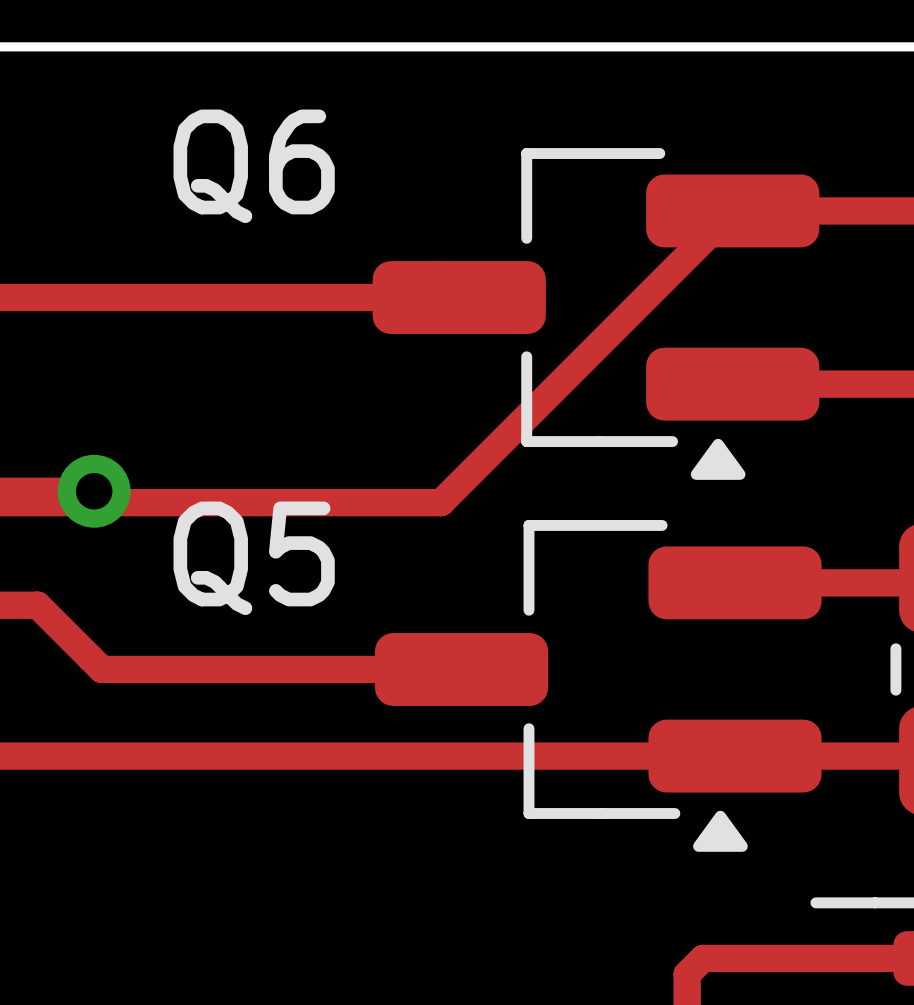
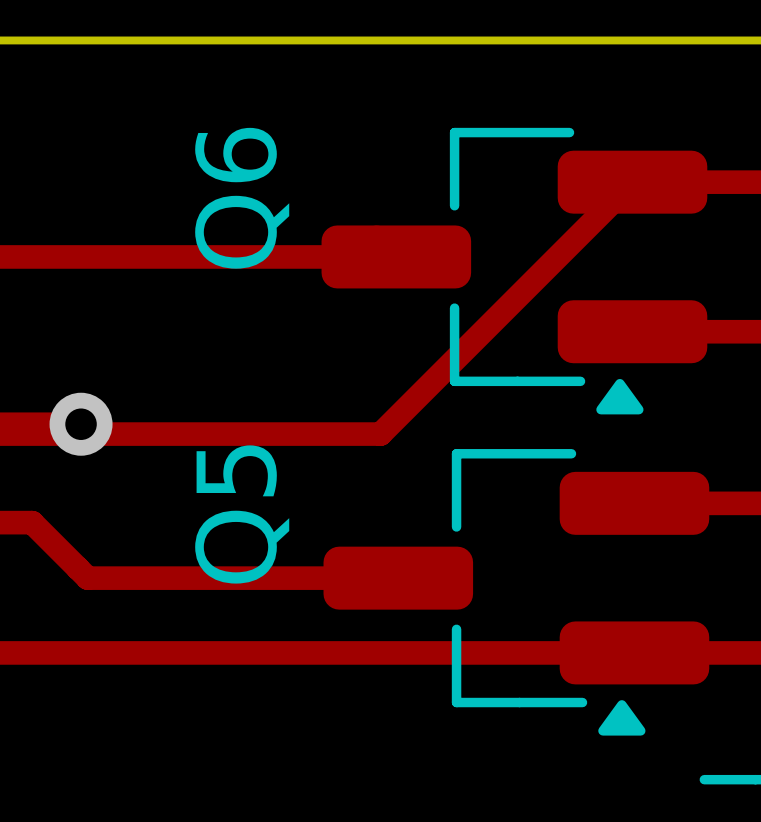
Q6 name rotation: 0° (254, 166) -> 90° counterclockwise (242, 198)
Q5 name rotation: 0° (254, 558) -> 90° counterclockwise (242, 514)

